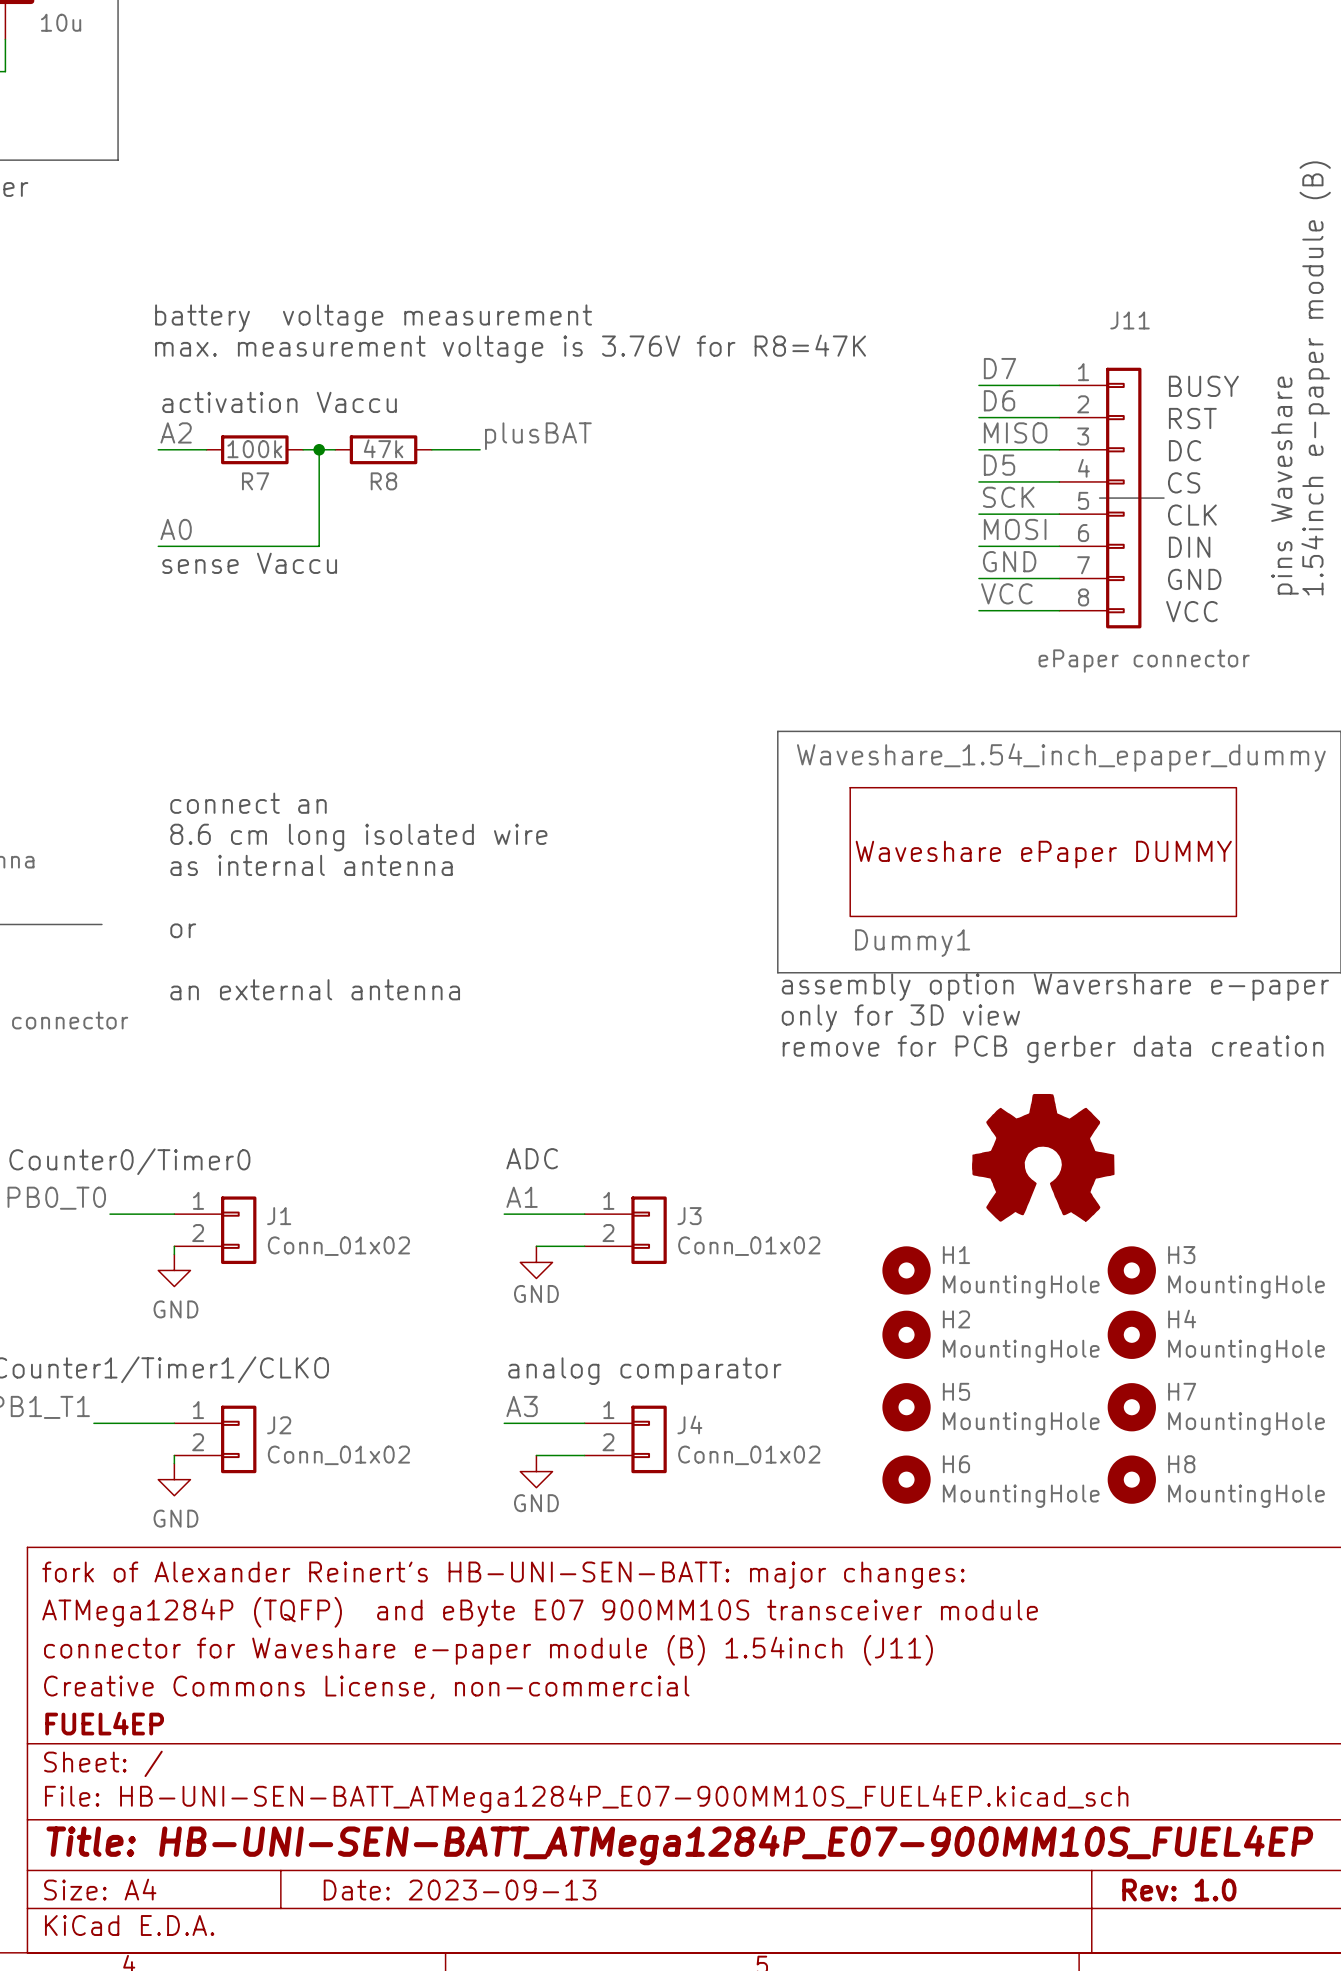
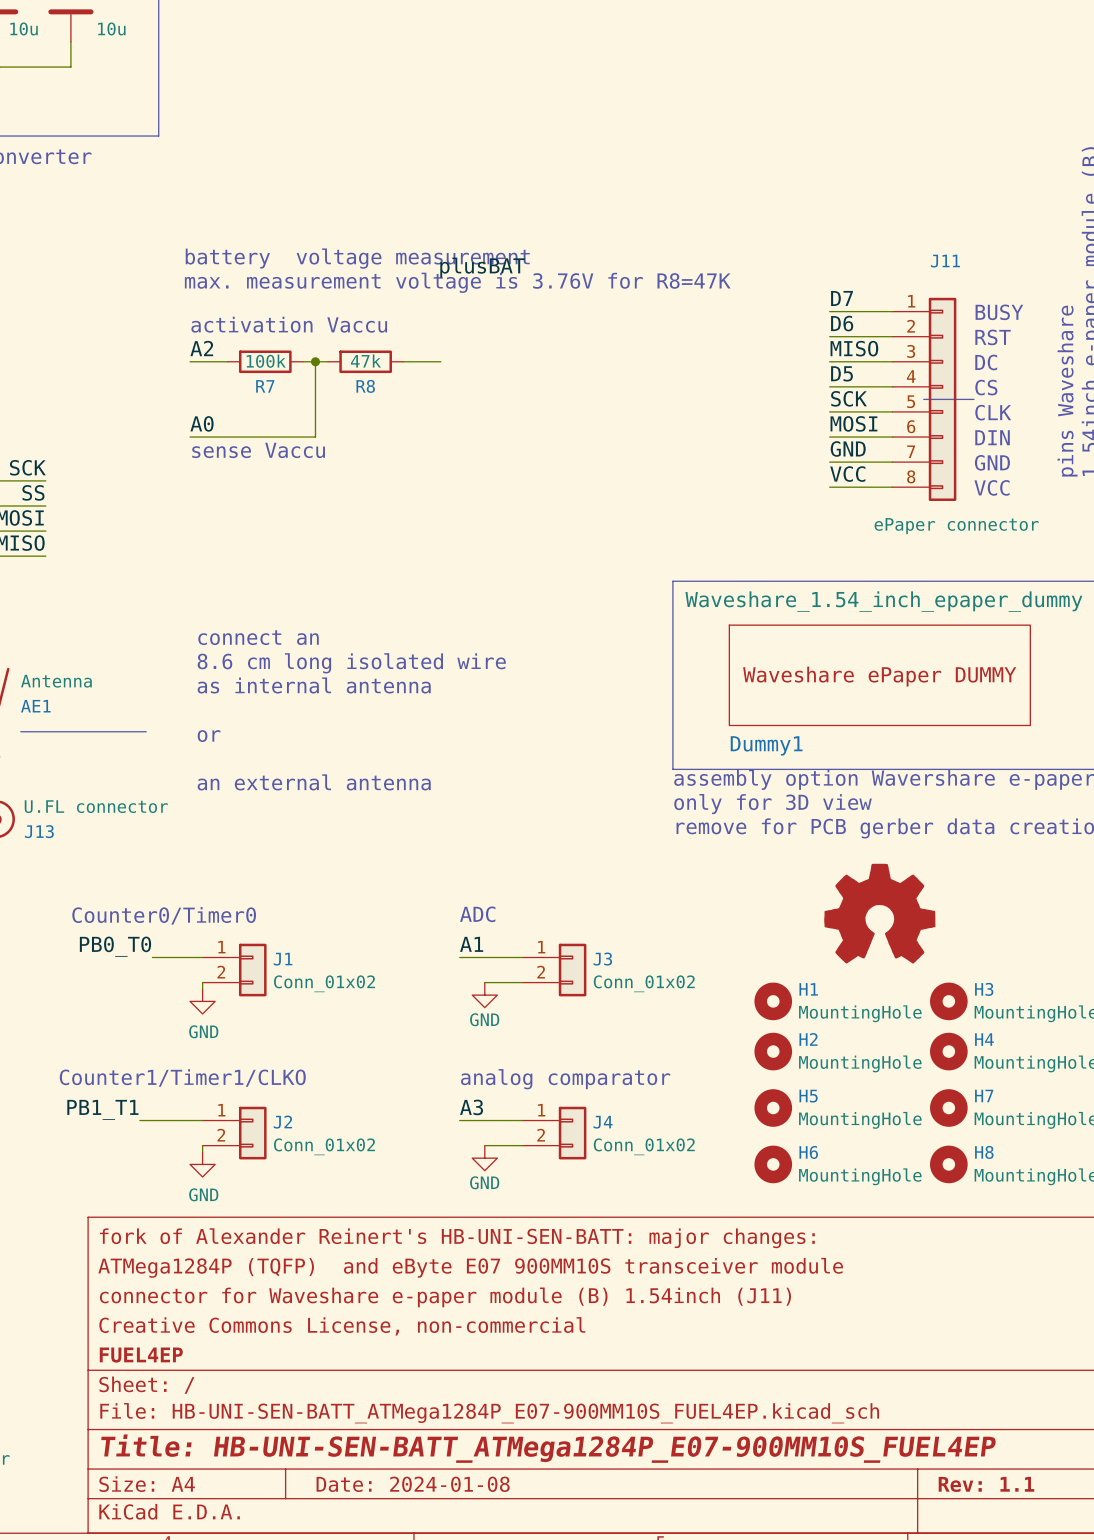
label position: plusBAT (538, 436) -> plusBAT (482, 267)
title block: Date: 2023-09-13 (459, 1890) -> Date: 2024-01-08 (413, 1484)
title block: Rev: 1.0 (1179, 1890) -> Rev: 1.1 (986, 1484)

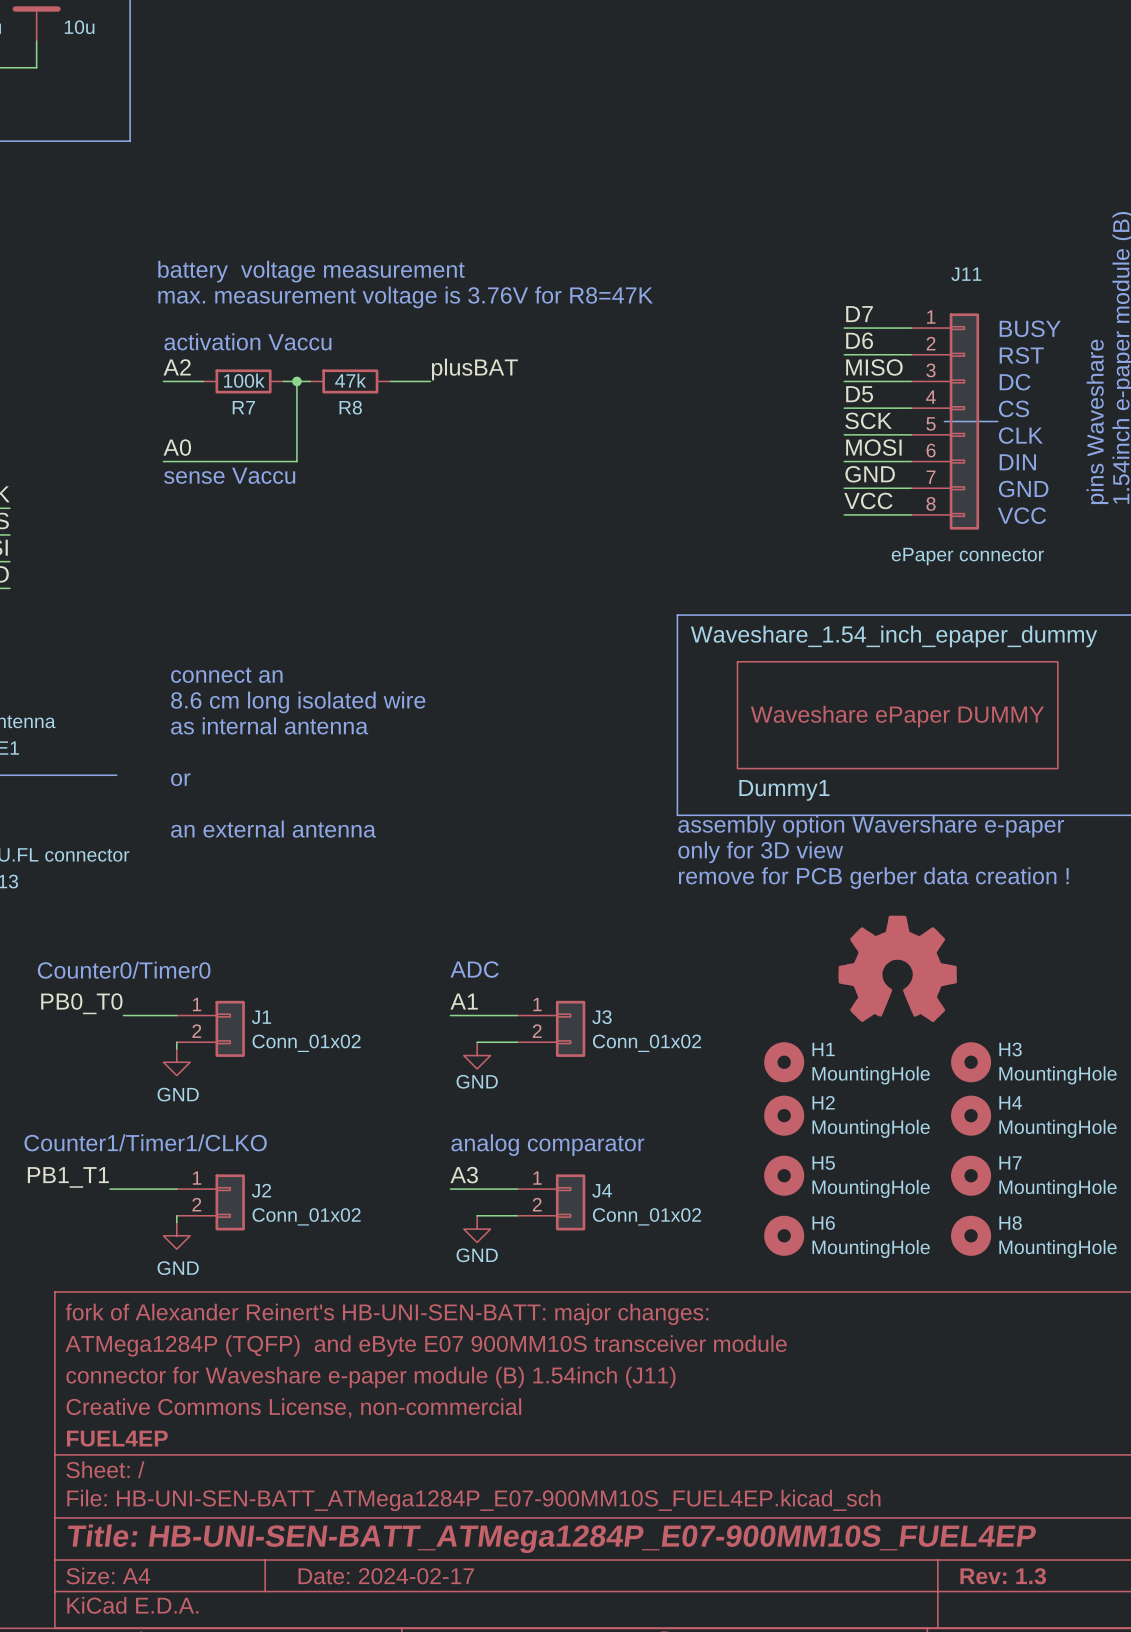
label position: plusBAT (482, 267) -> plusBAT (474, 369)
title block: Date: 2024-01-08 (413, 1484) -> Date: 2024-02-17 (386, 1576)
title block: Rev: 1.1 (986, 1484) -> Rev: 1.3 (1003, 1576)

